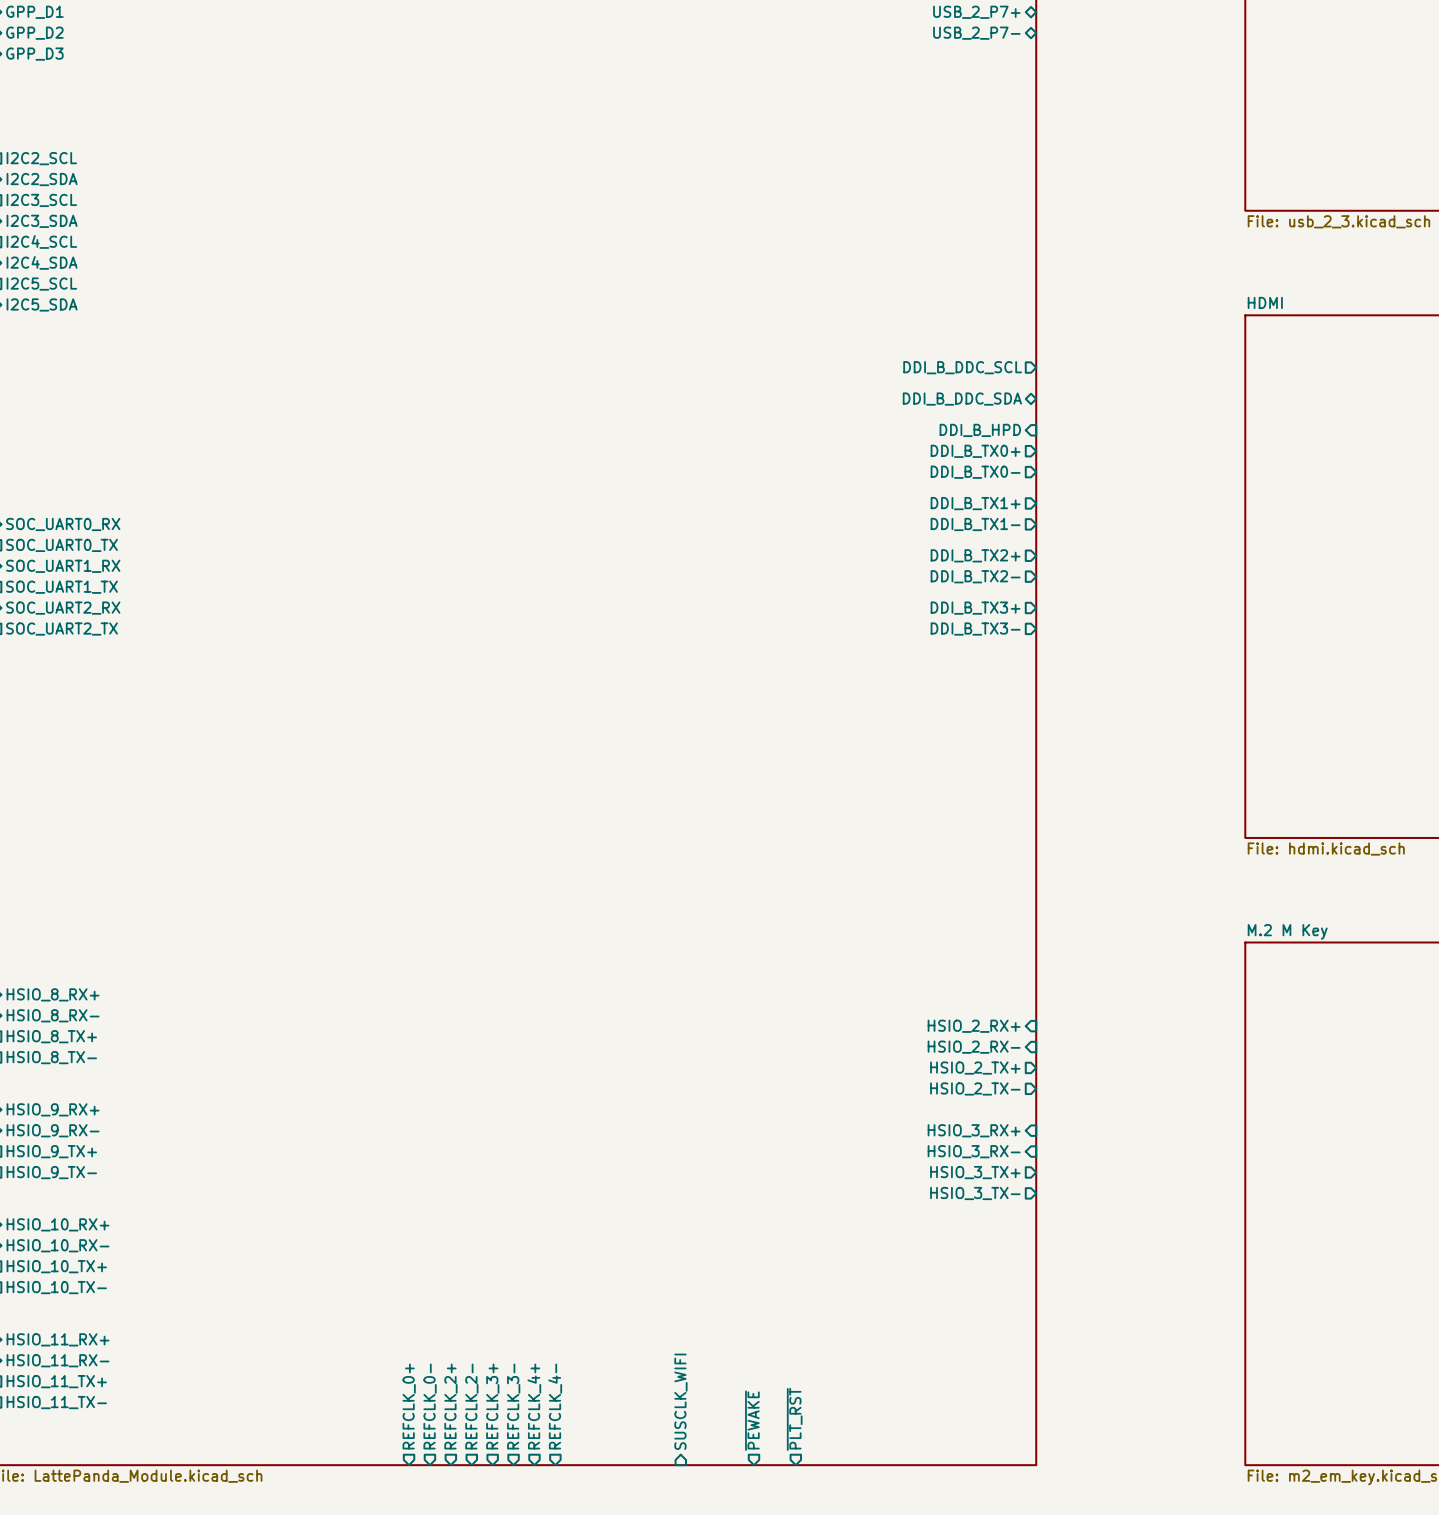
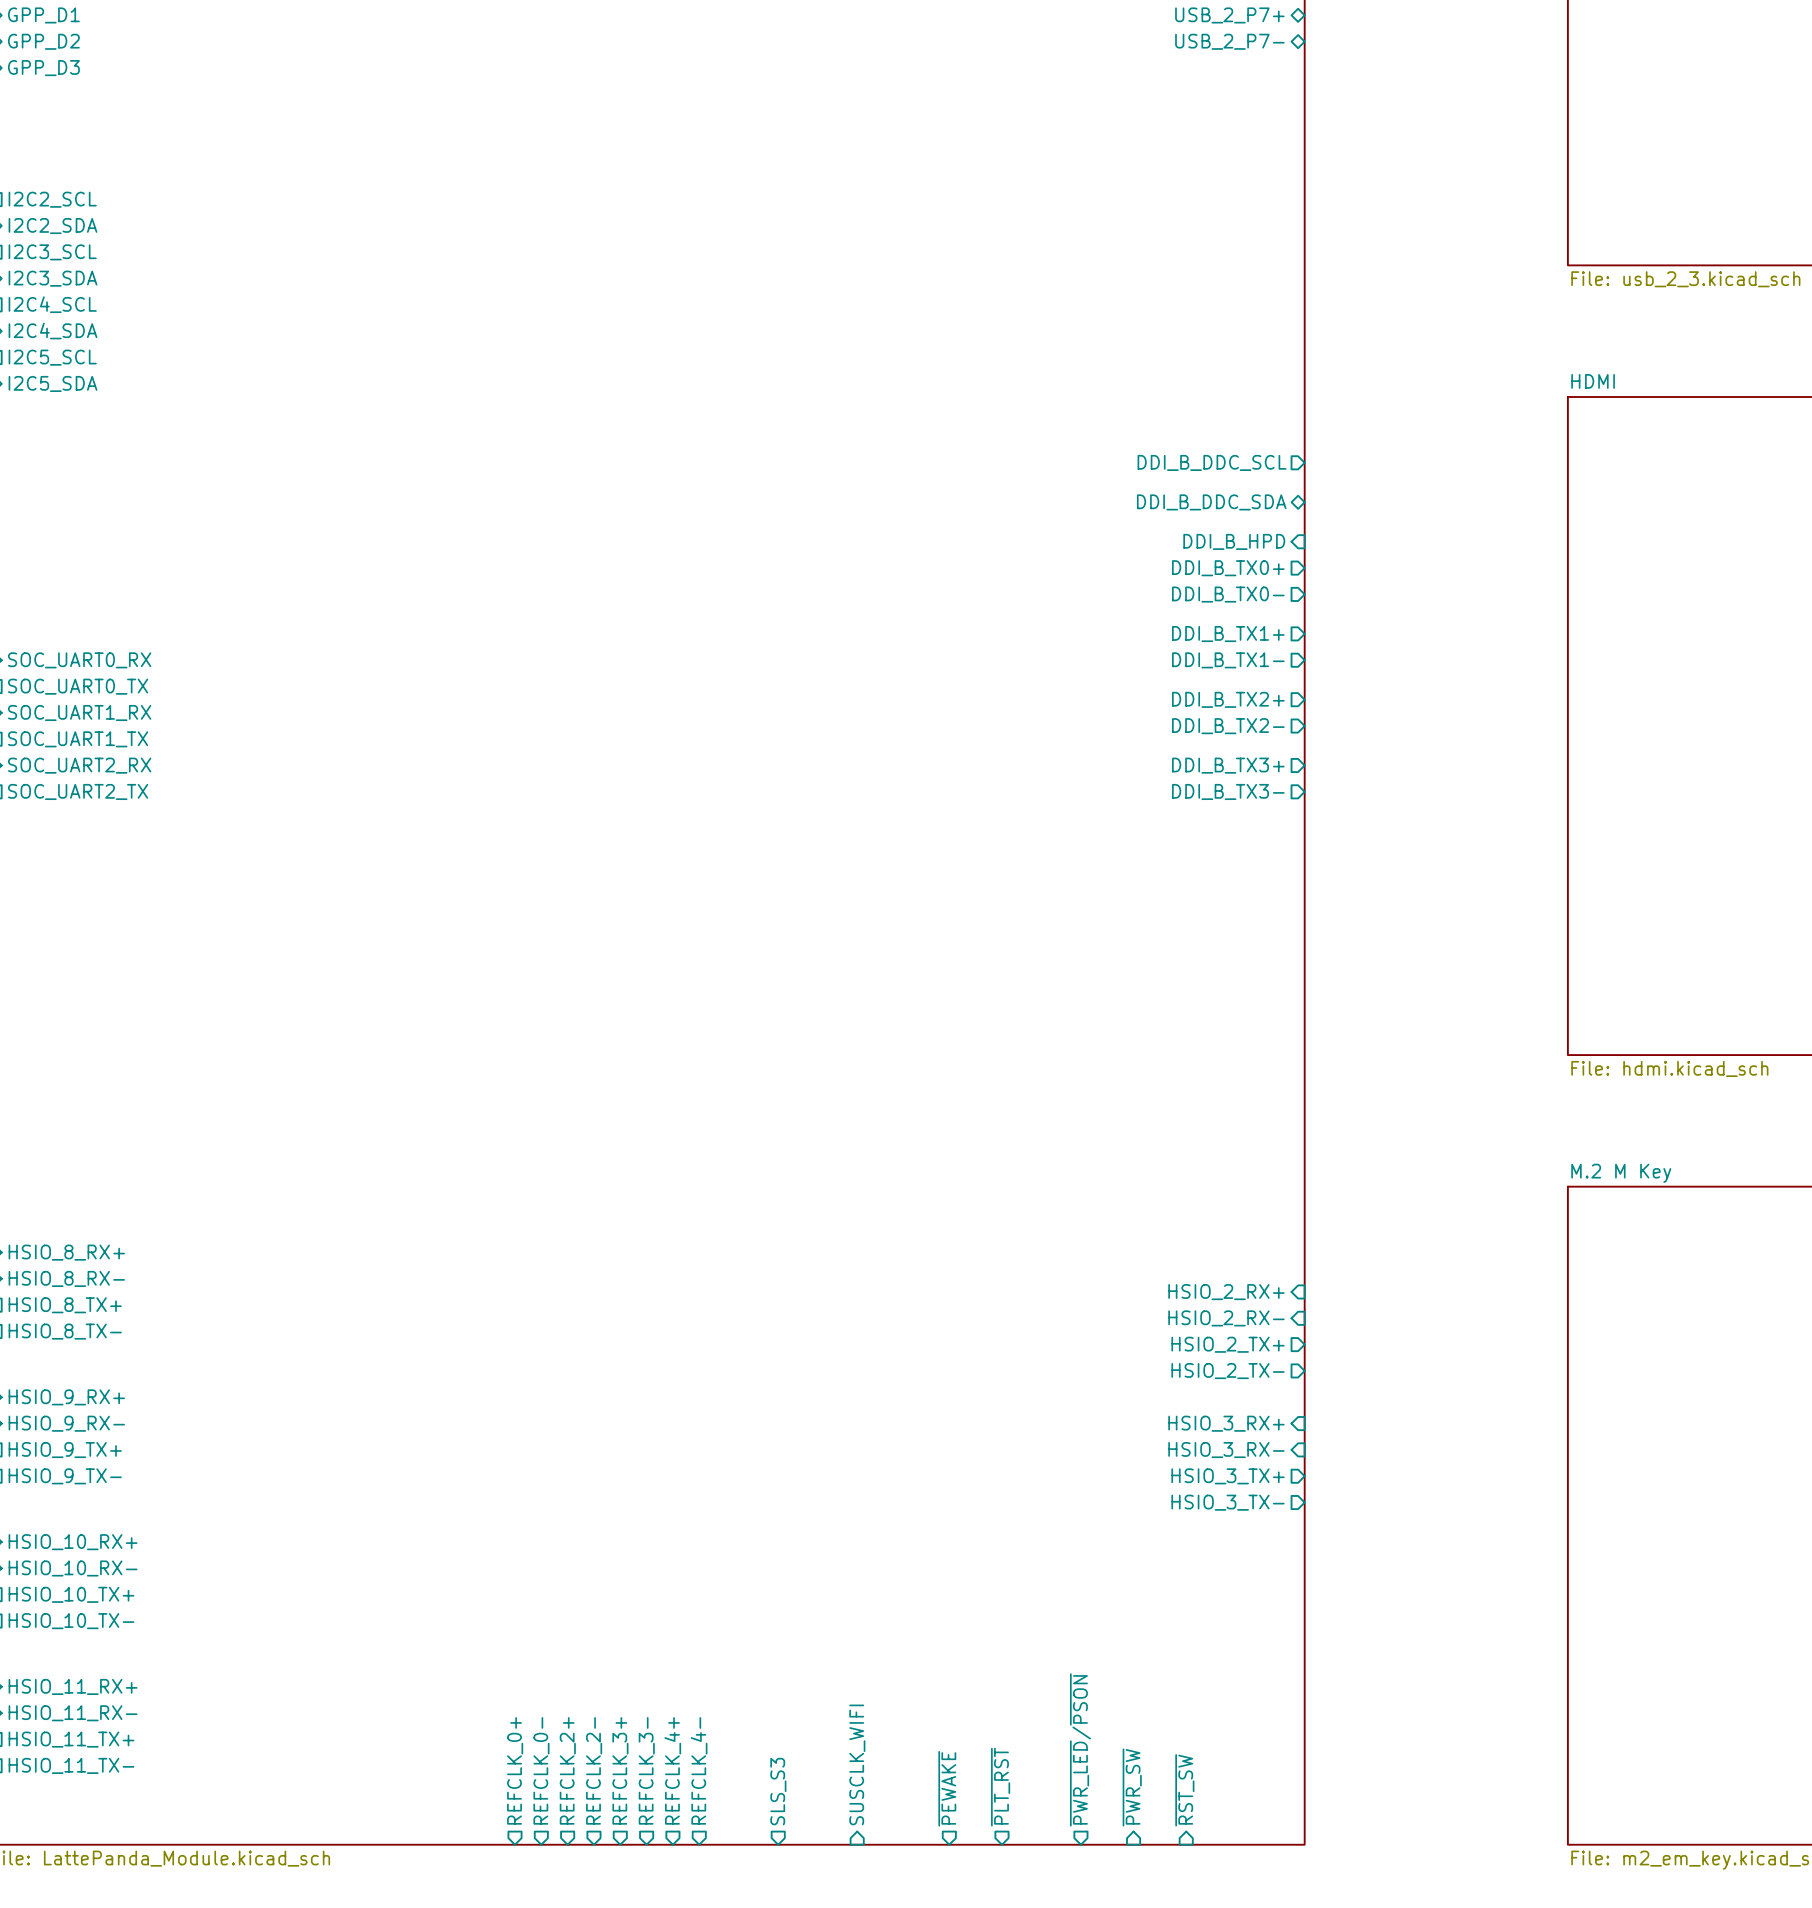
sheet pin: none -> ~{PWR_LED}/~{PSON} (1080, 1749)
sheet pin: none -> ~{PWR_SW} (1132, 1787)
sheet pin: none -> ~{RST_SW} (1184, 1790)
sheet pin: none -> SLS_S3 (778, 1791)

